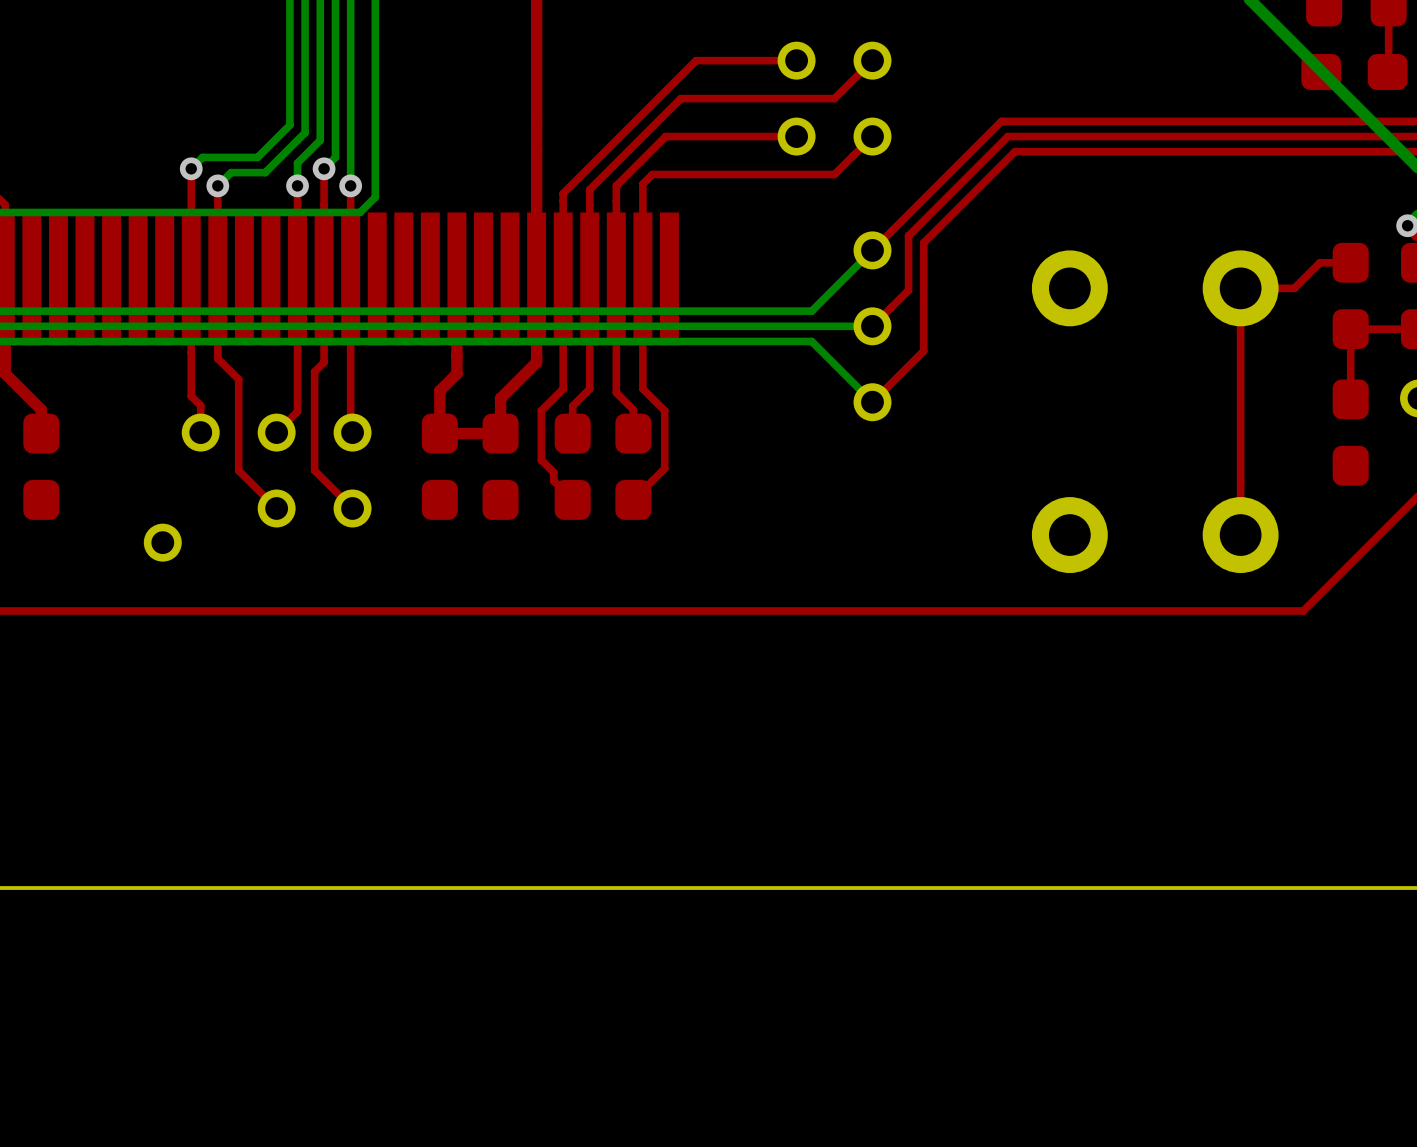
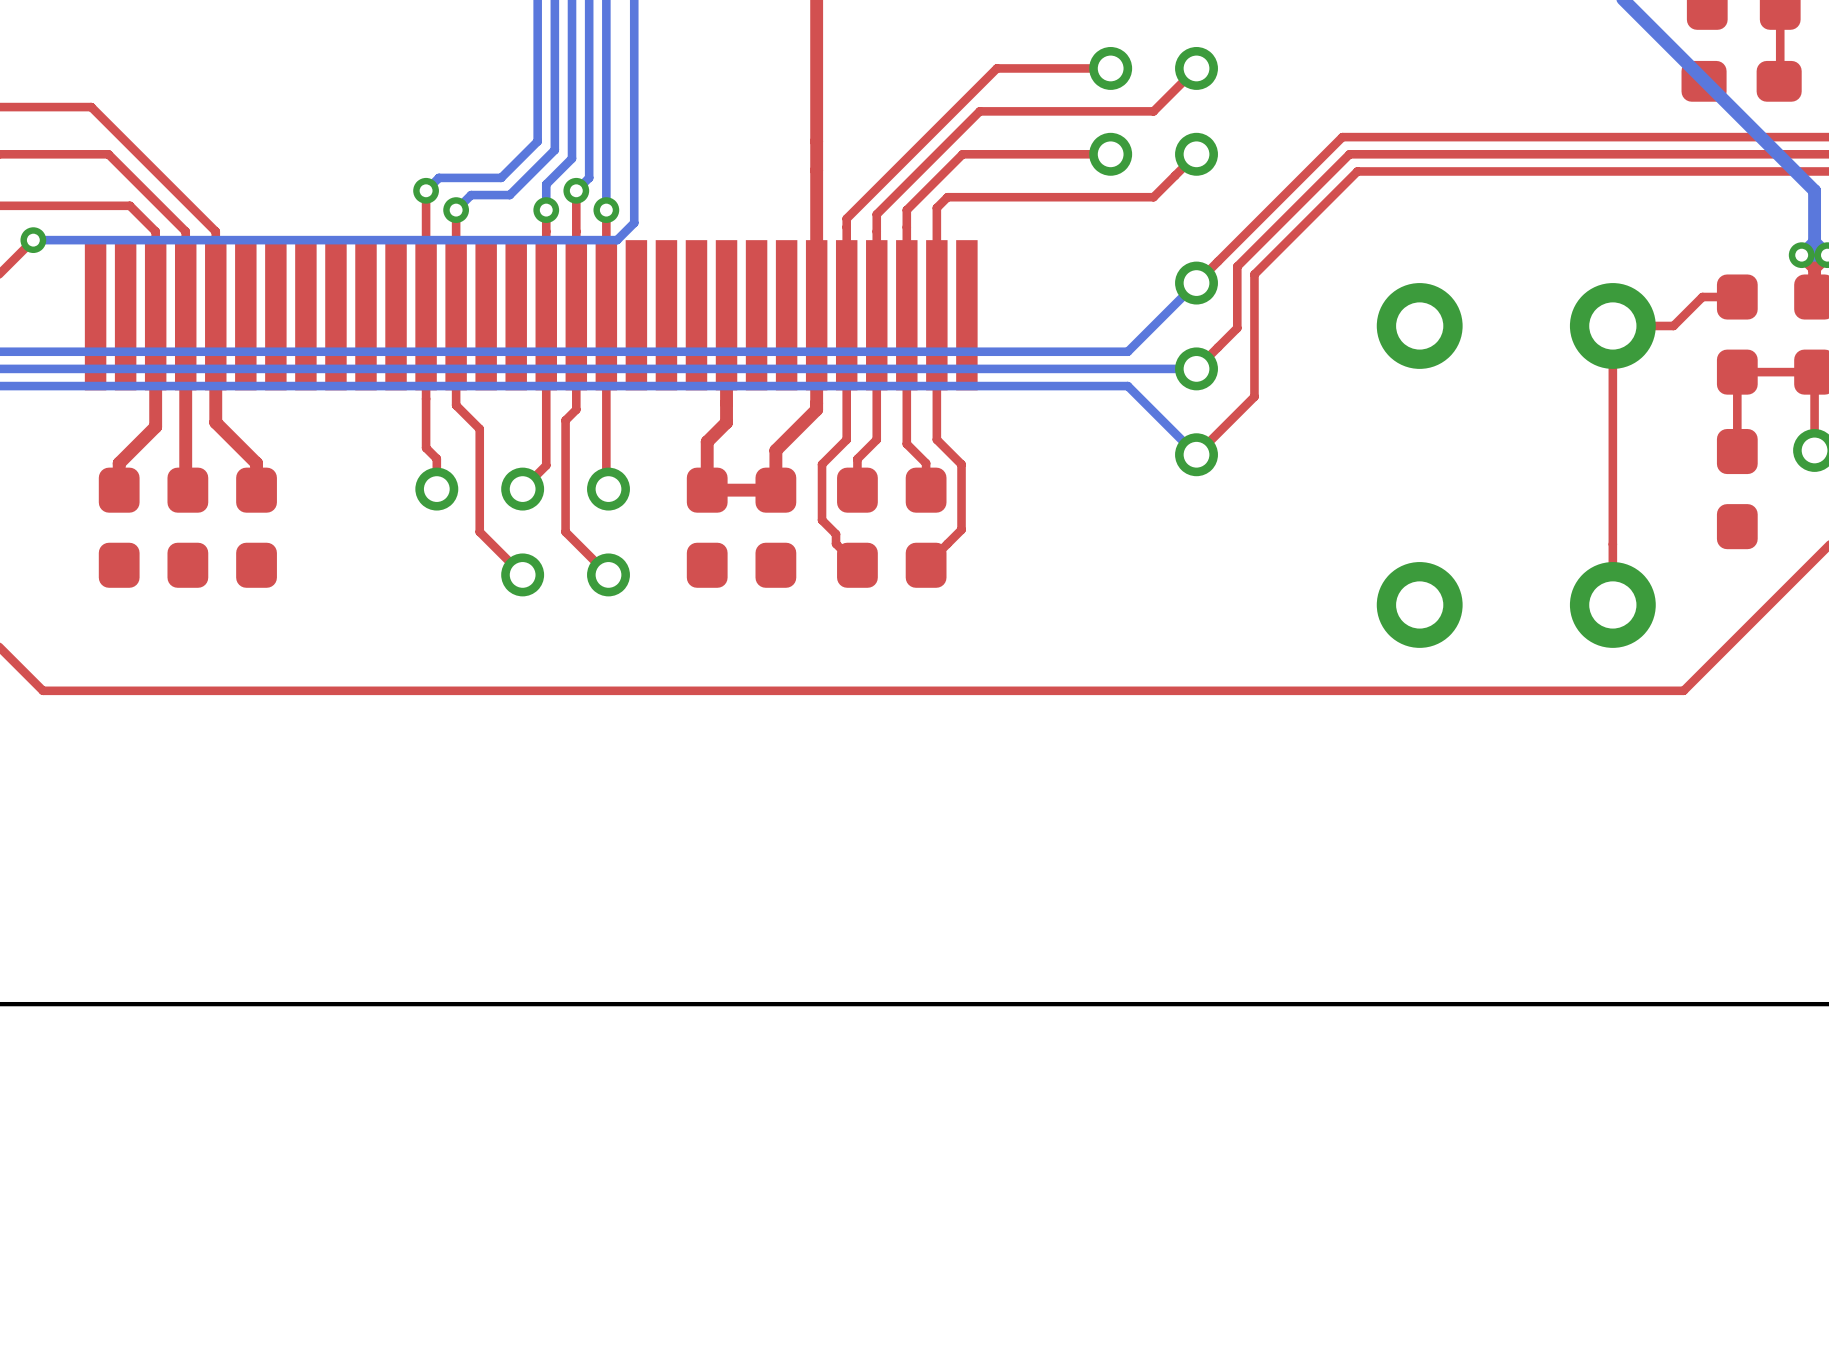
part: (162, 542) -> none

